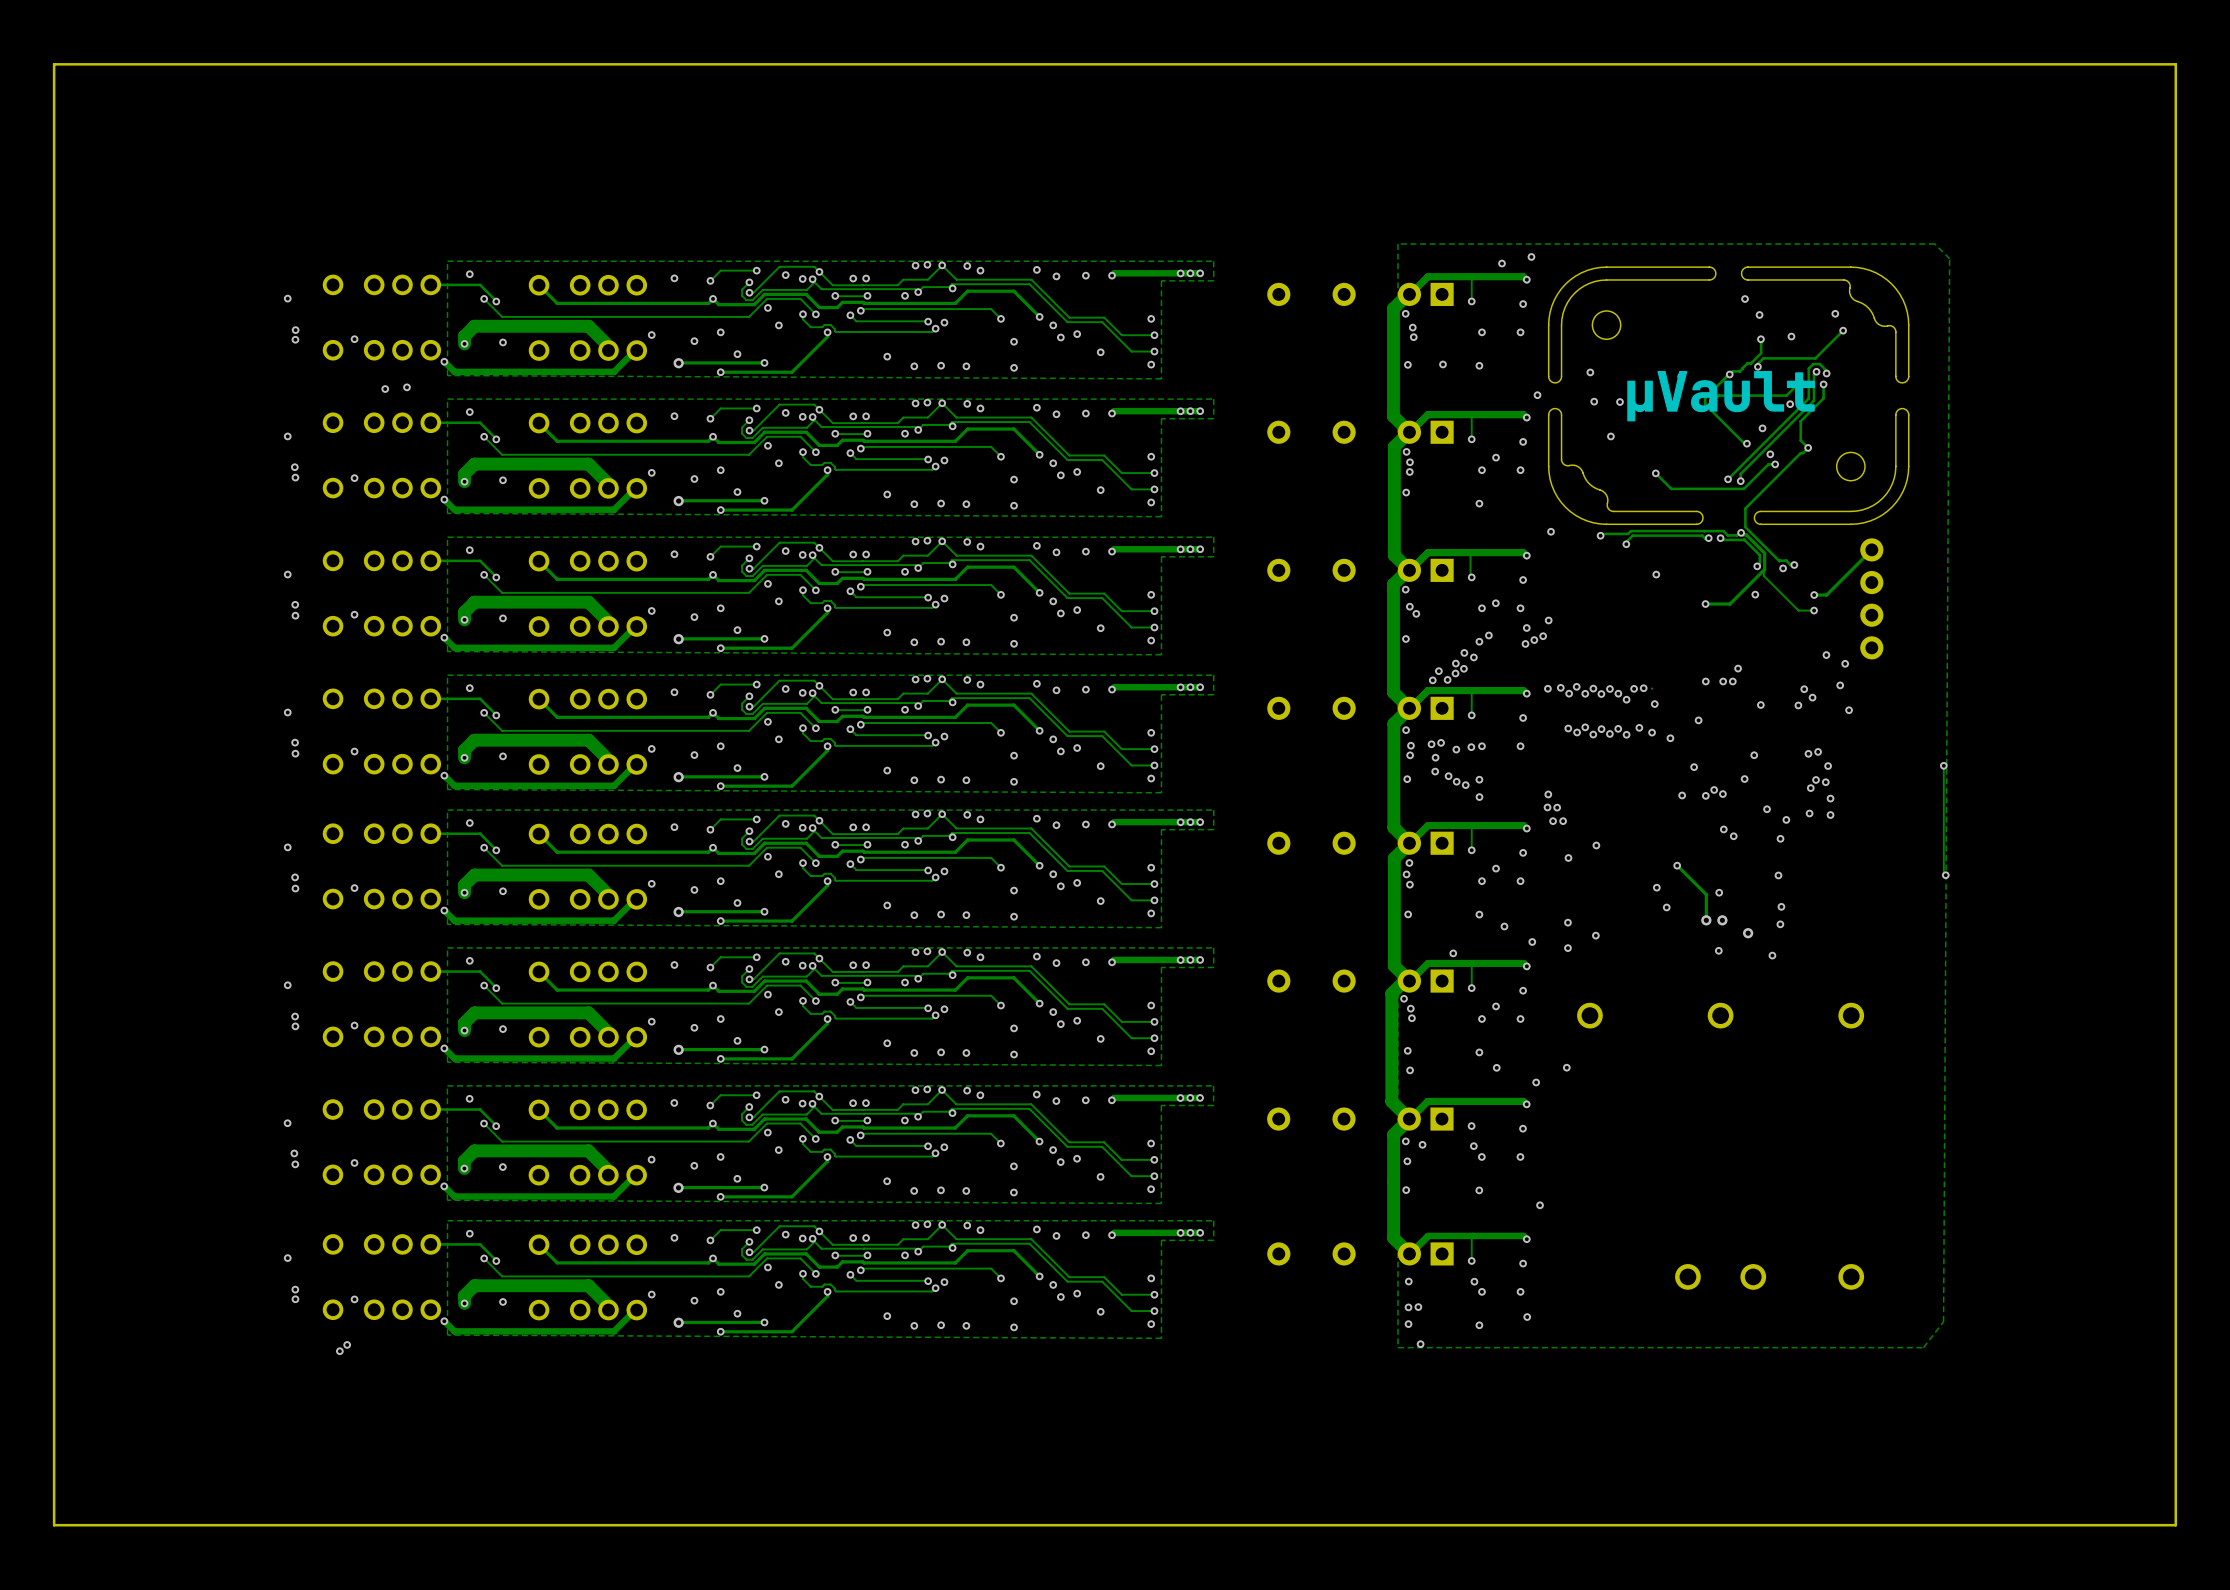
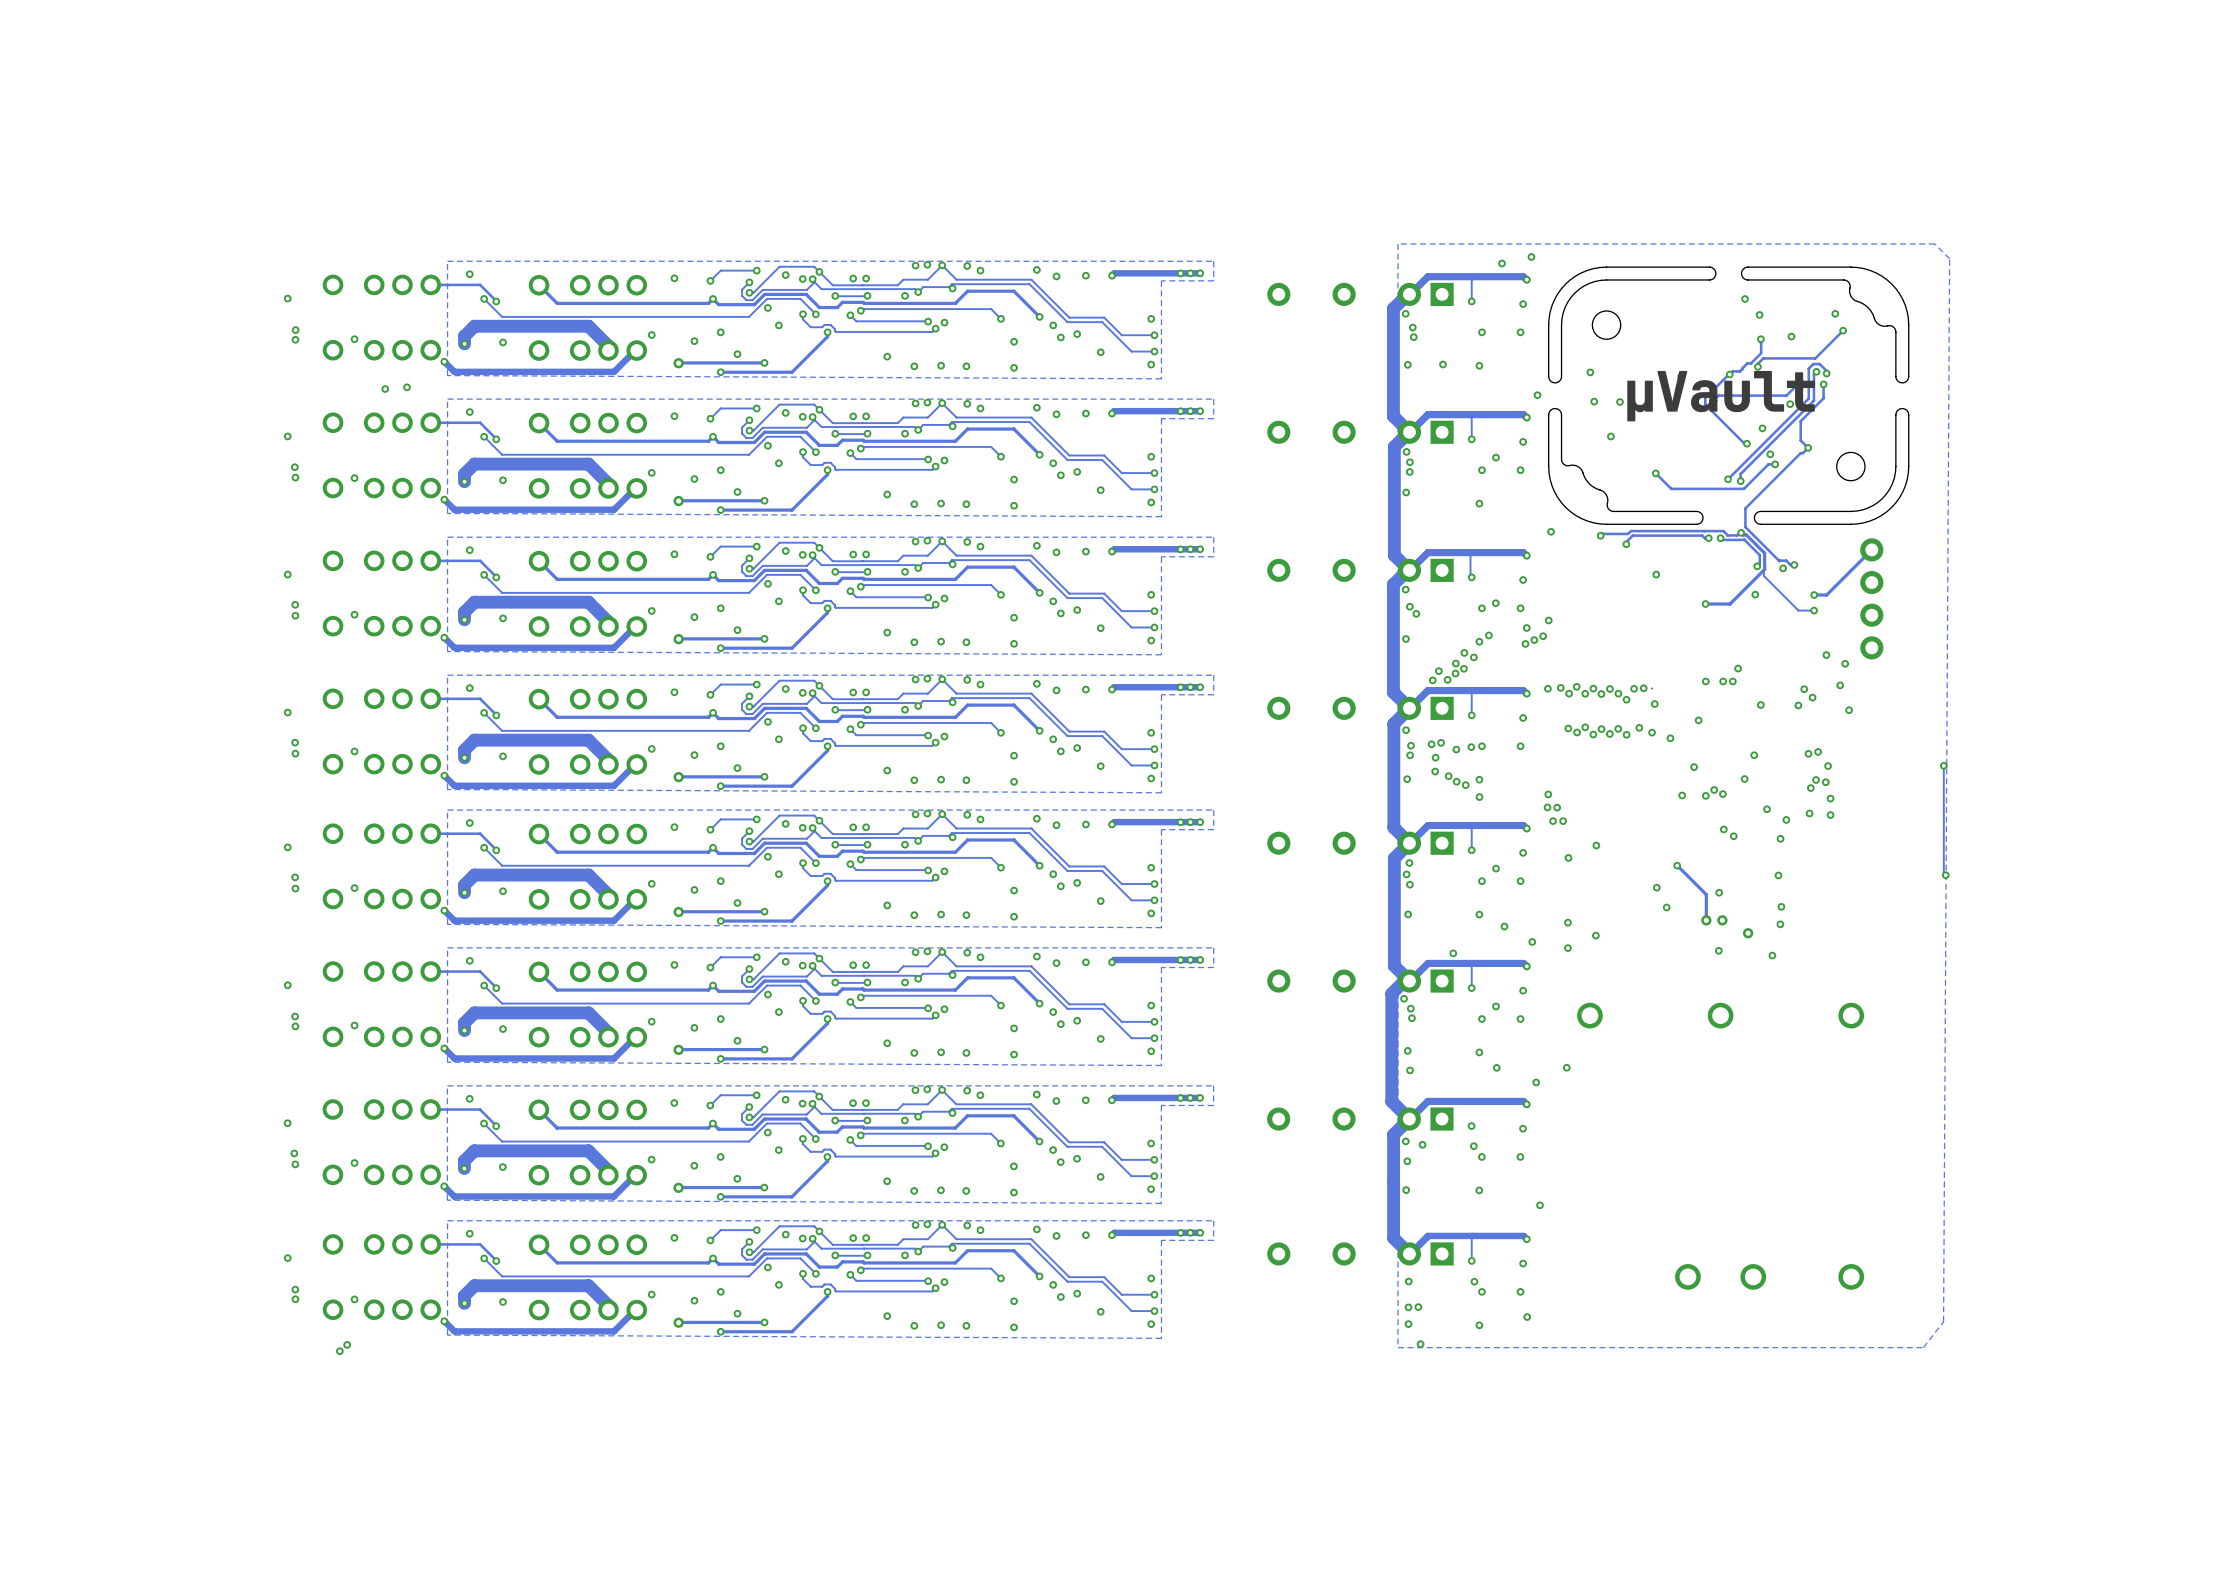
board edge: (2175, 64) (54, 64) (54, 1525) (2175, 1525) (2175, 64) -> none

